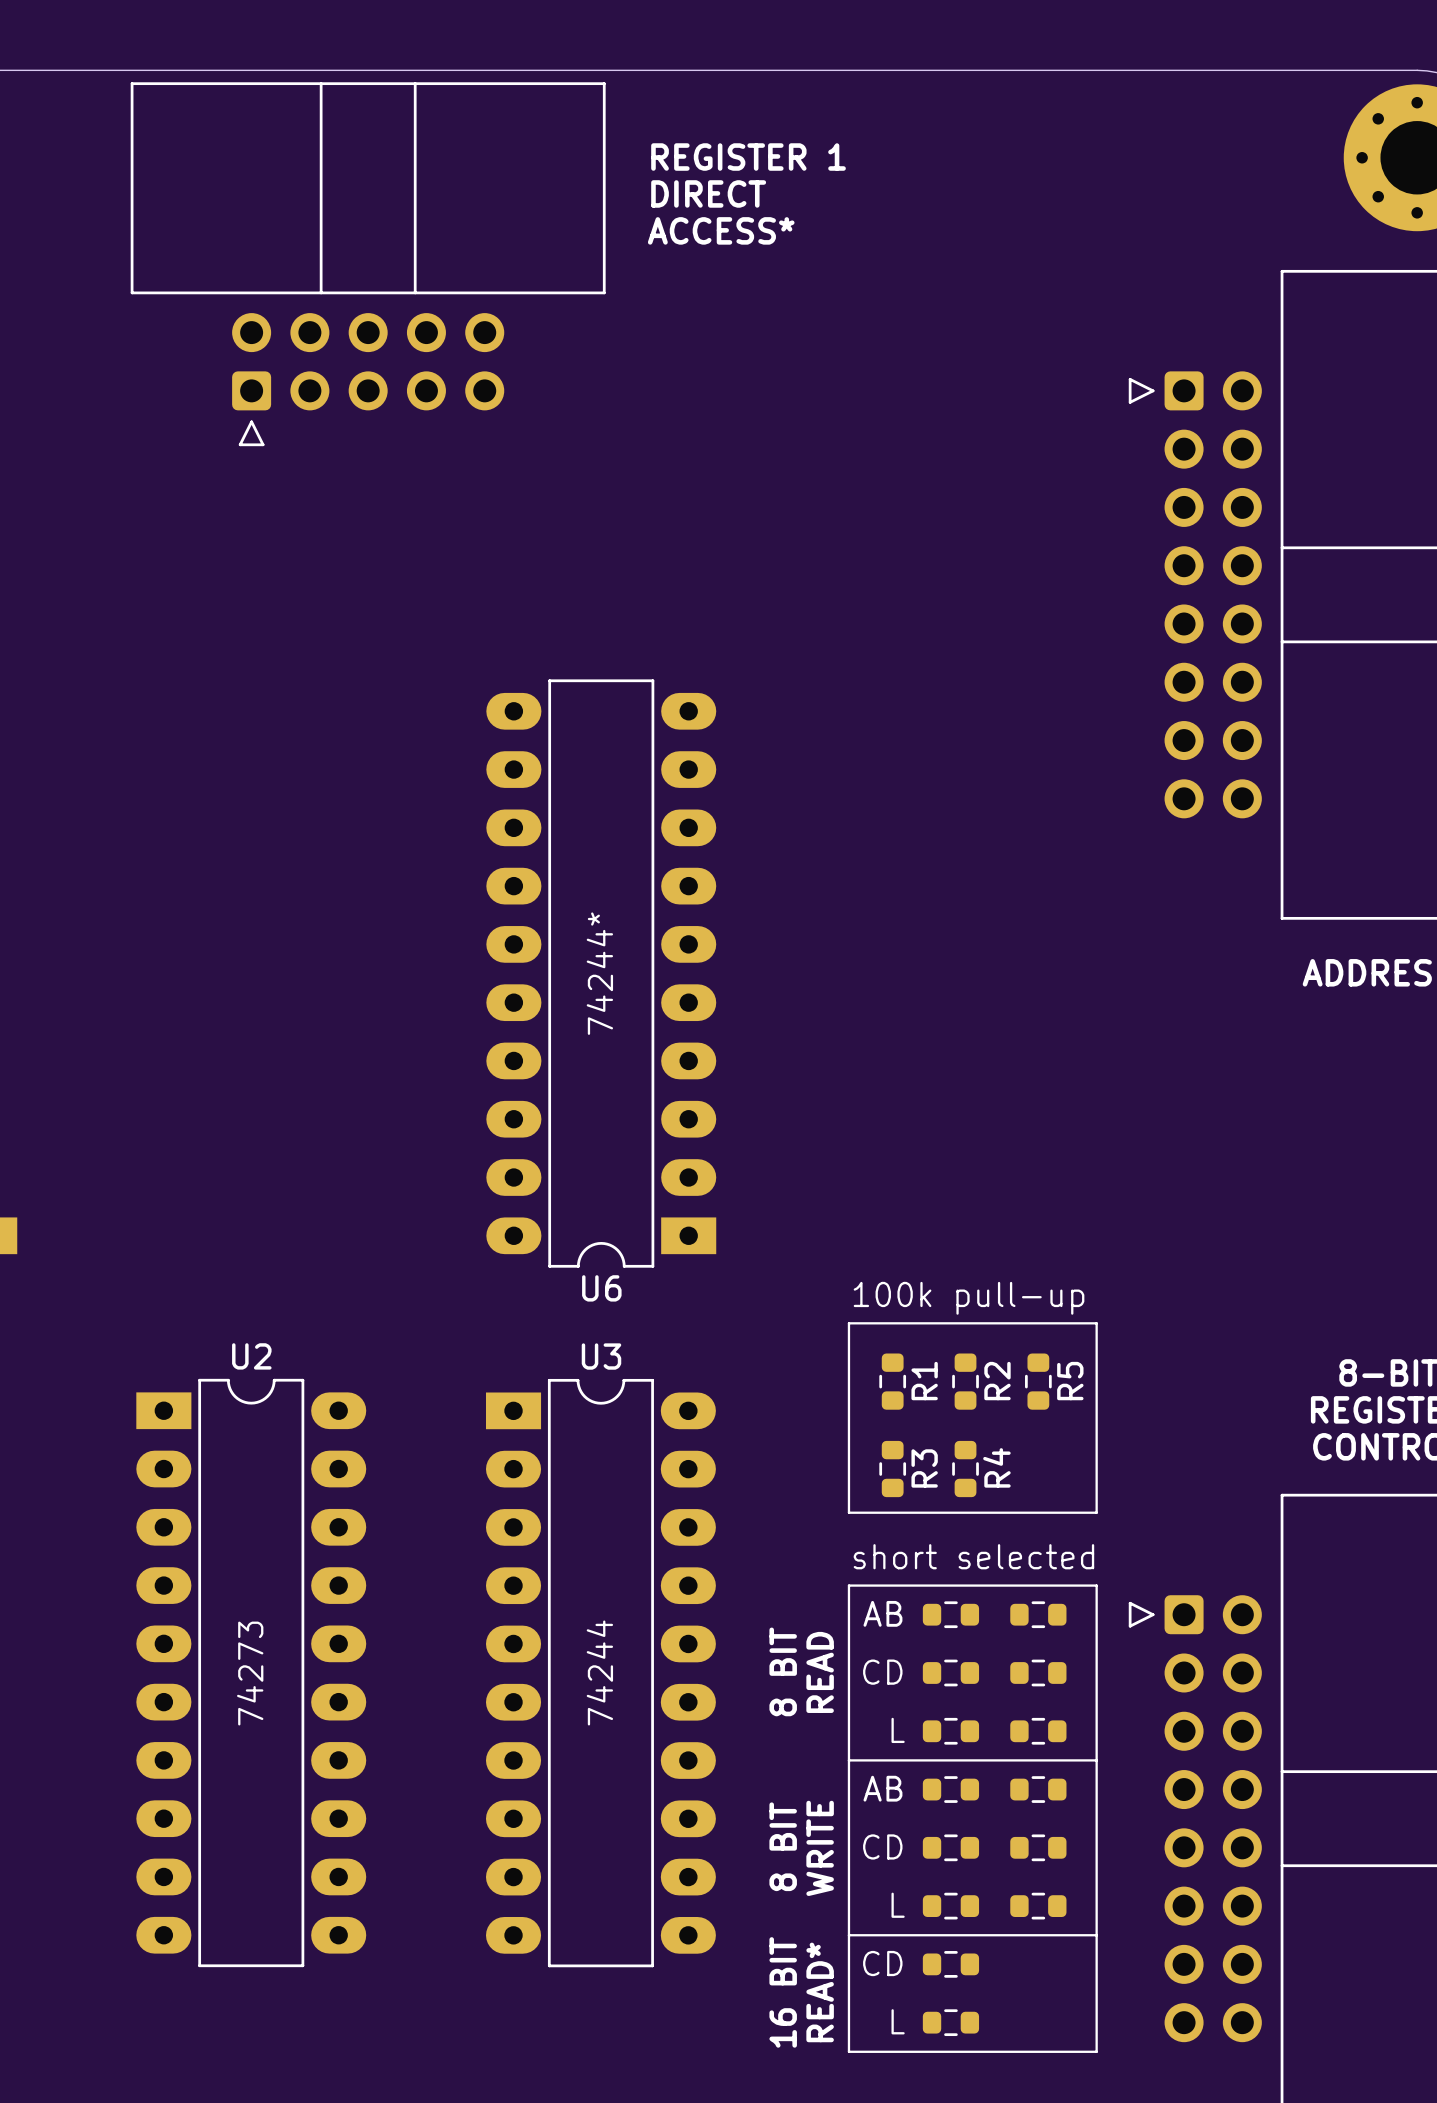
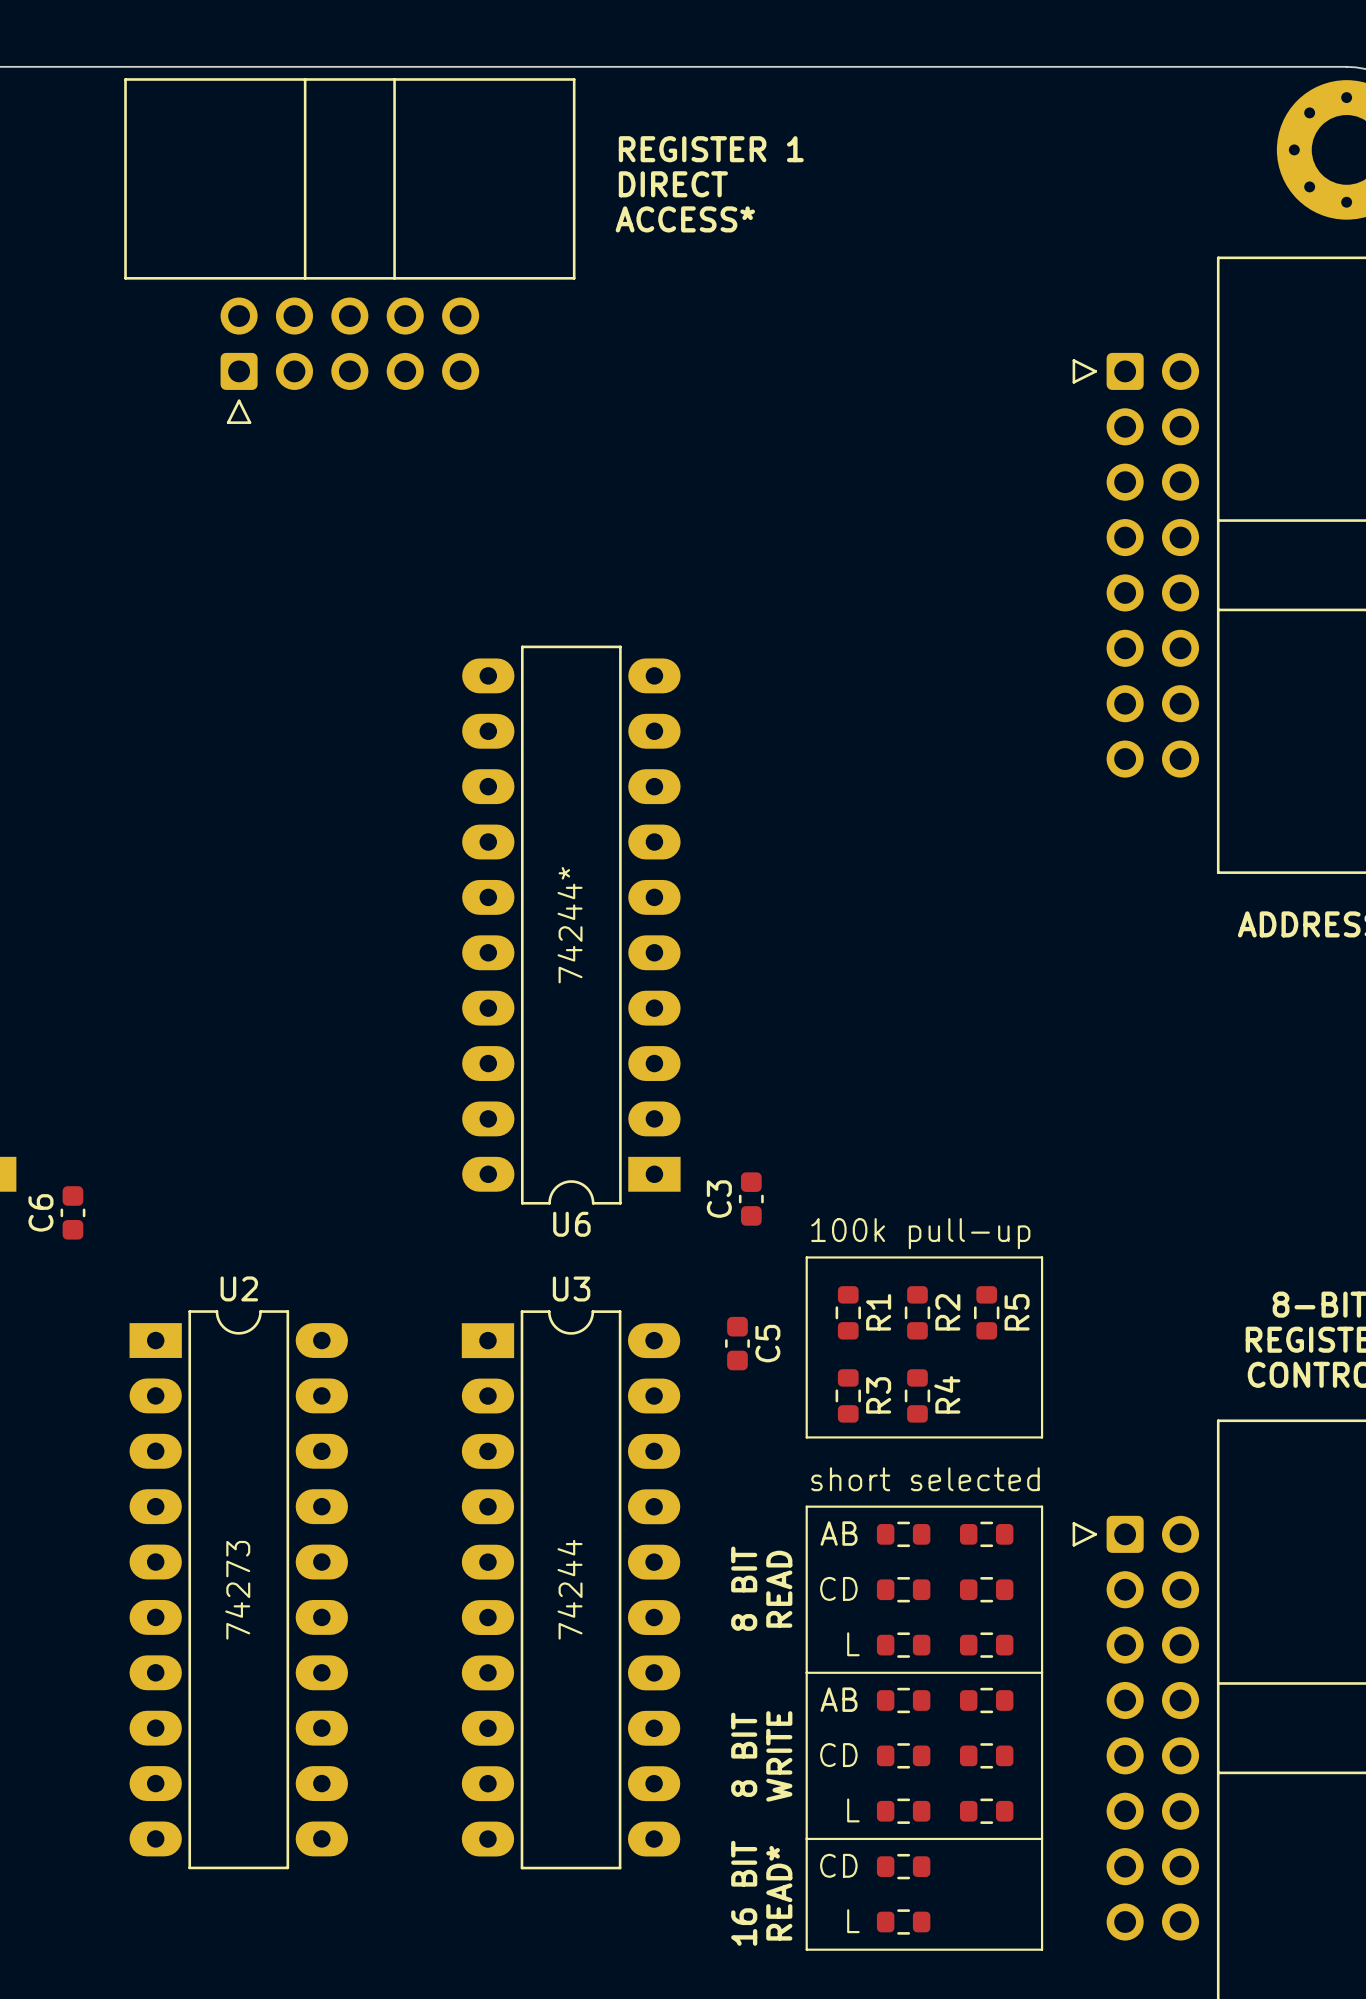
C3: none -> (751, 1199)
C6: none -> (72, 1212)
C5: none -> (737, 1343)

